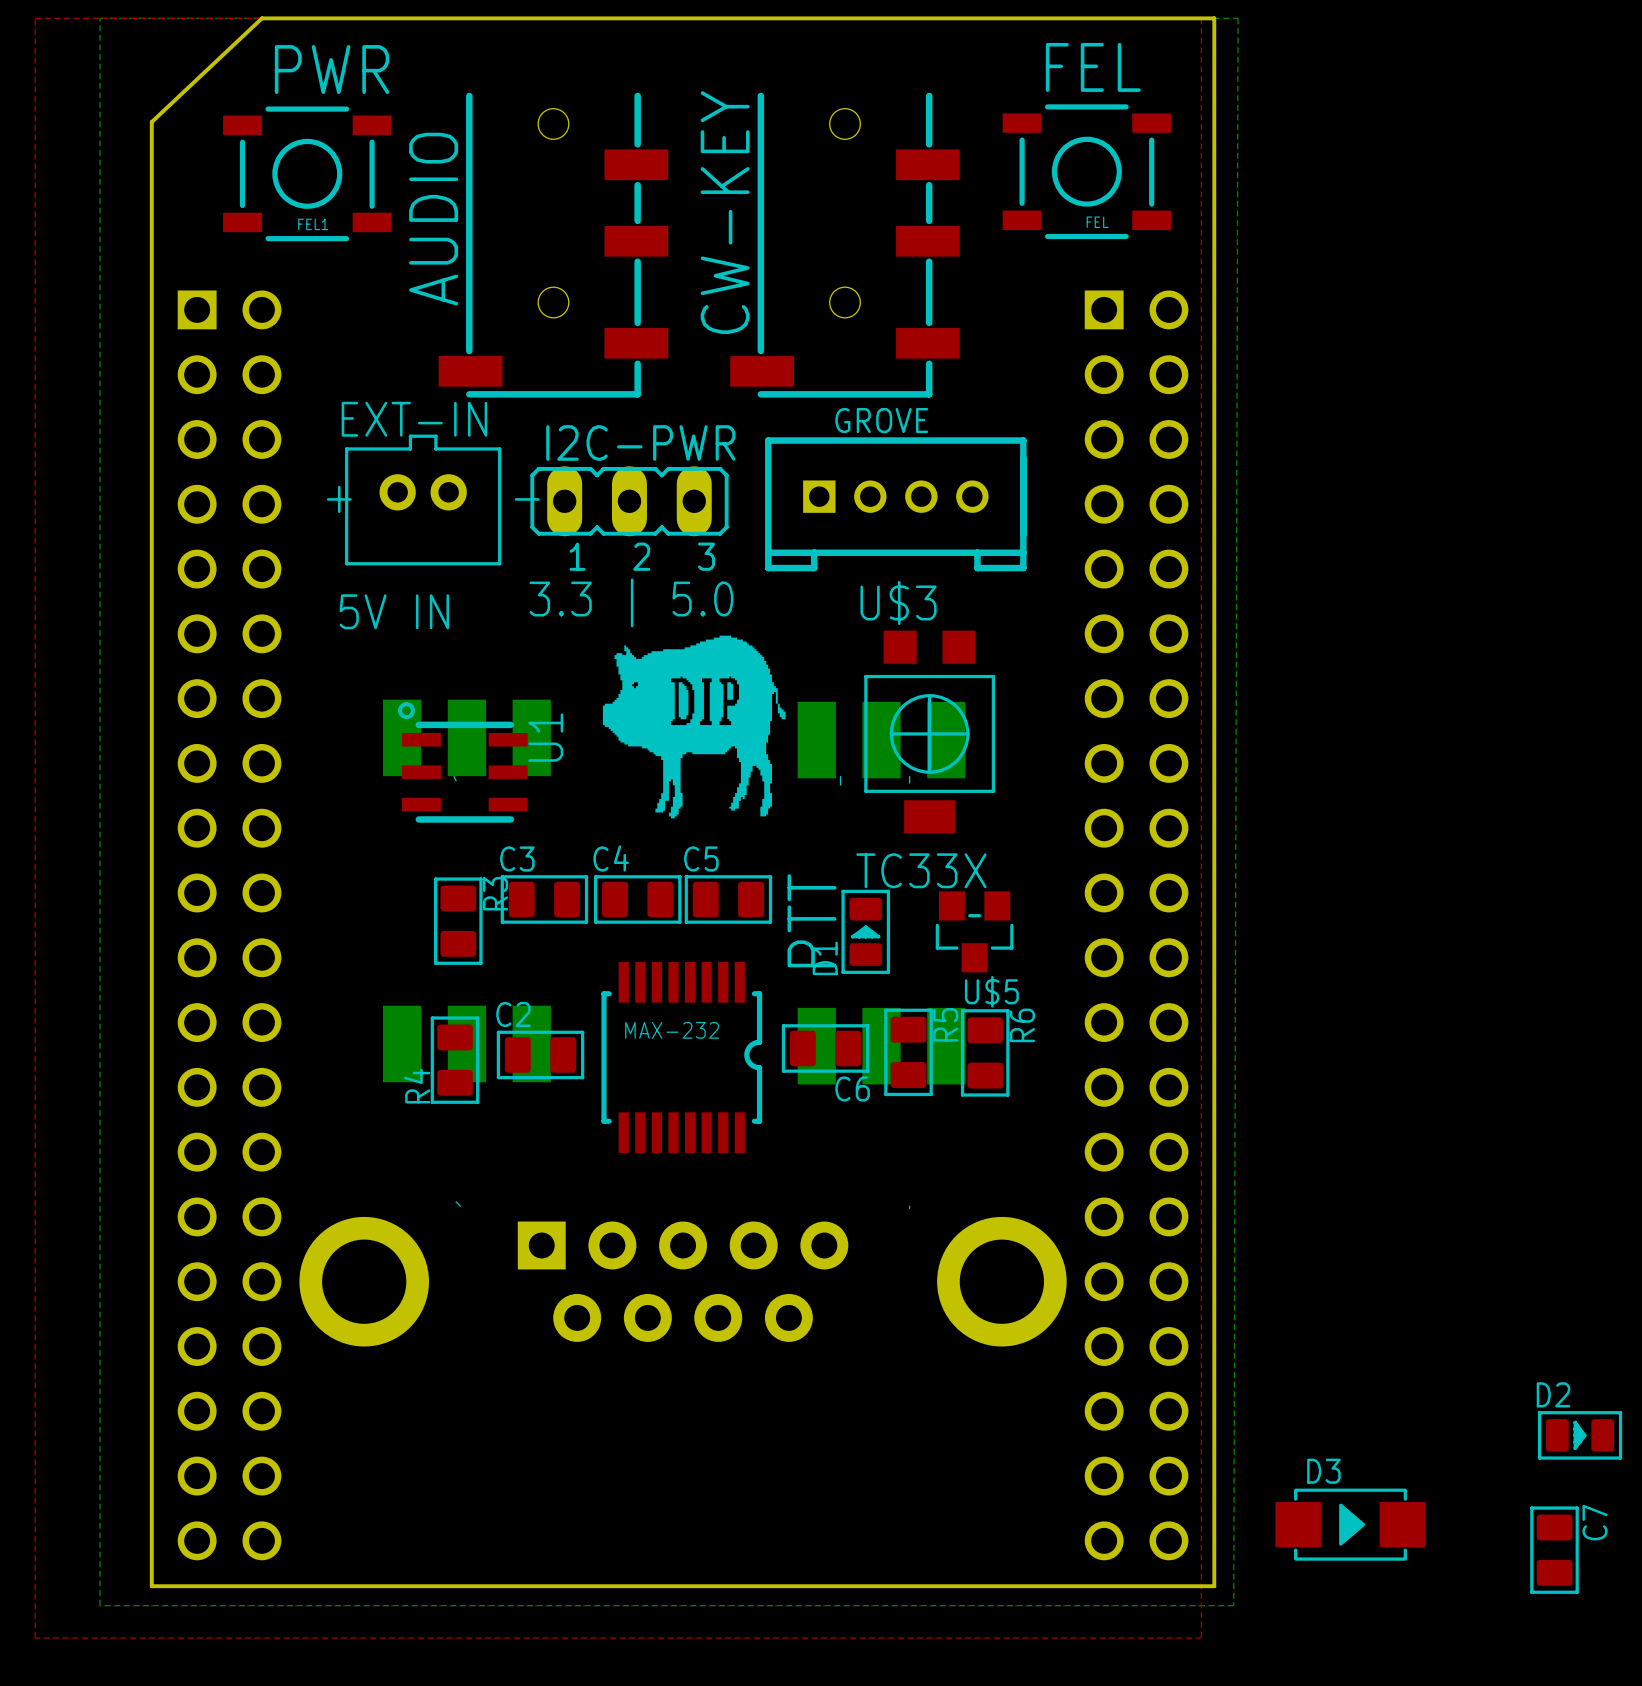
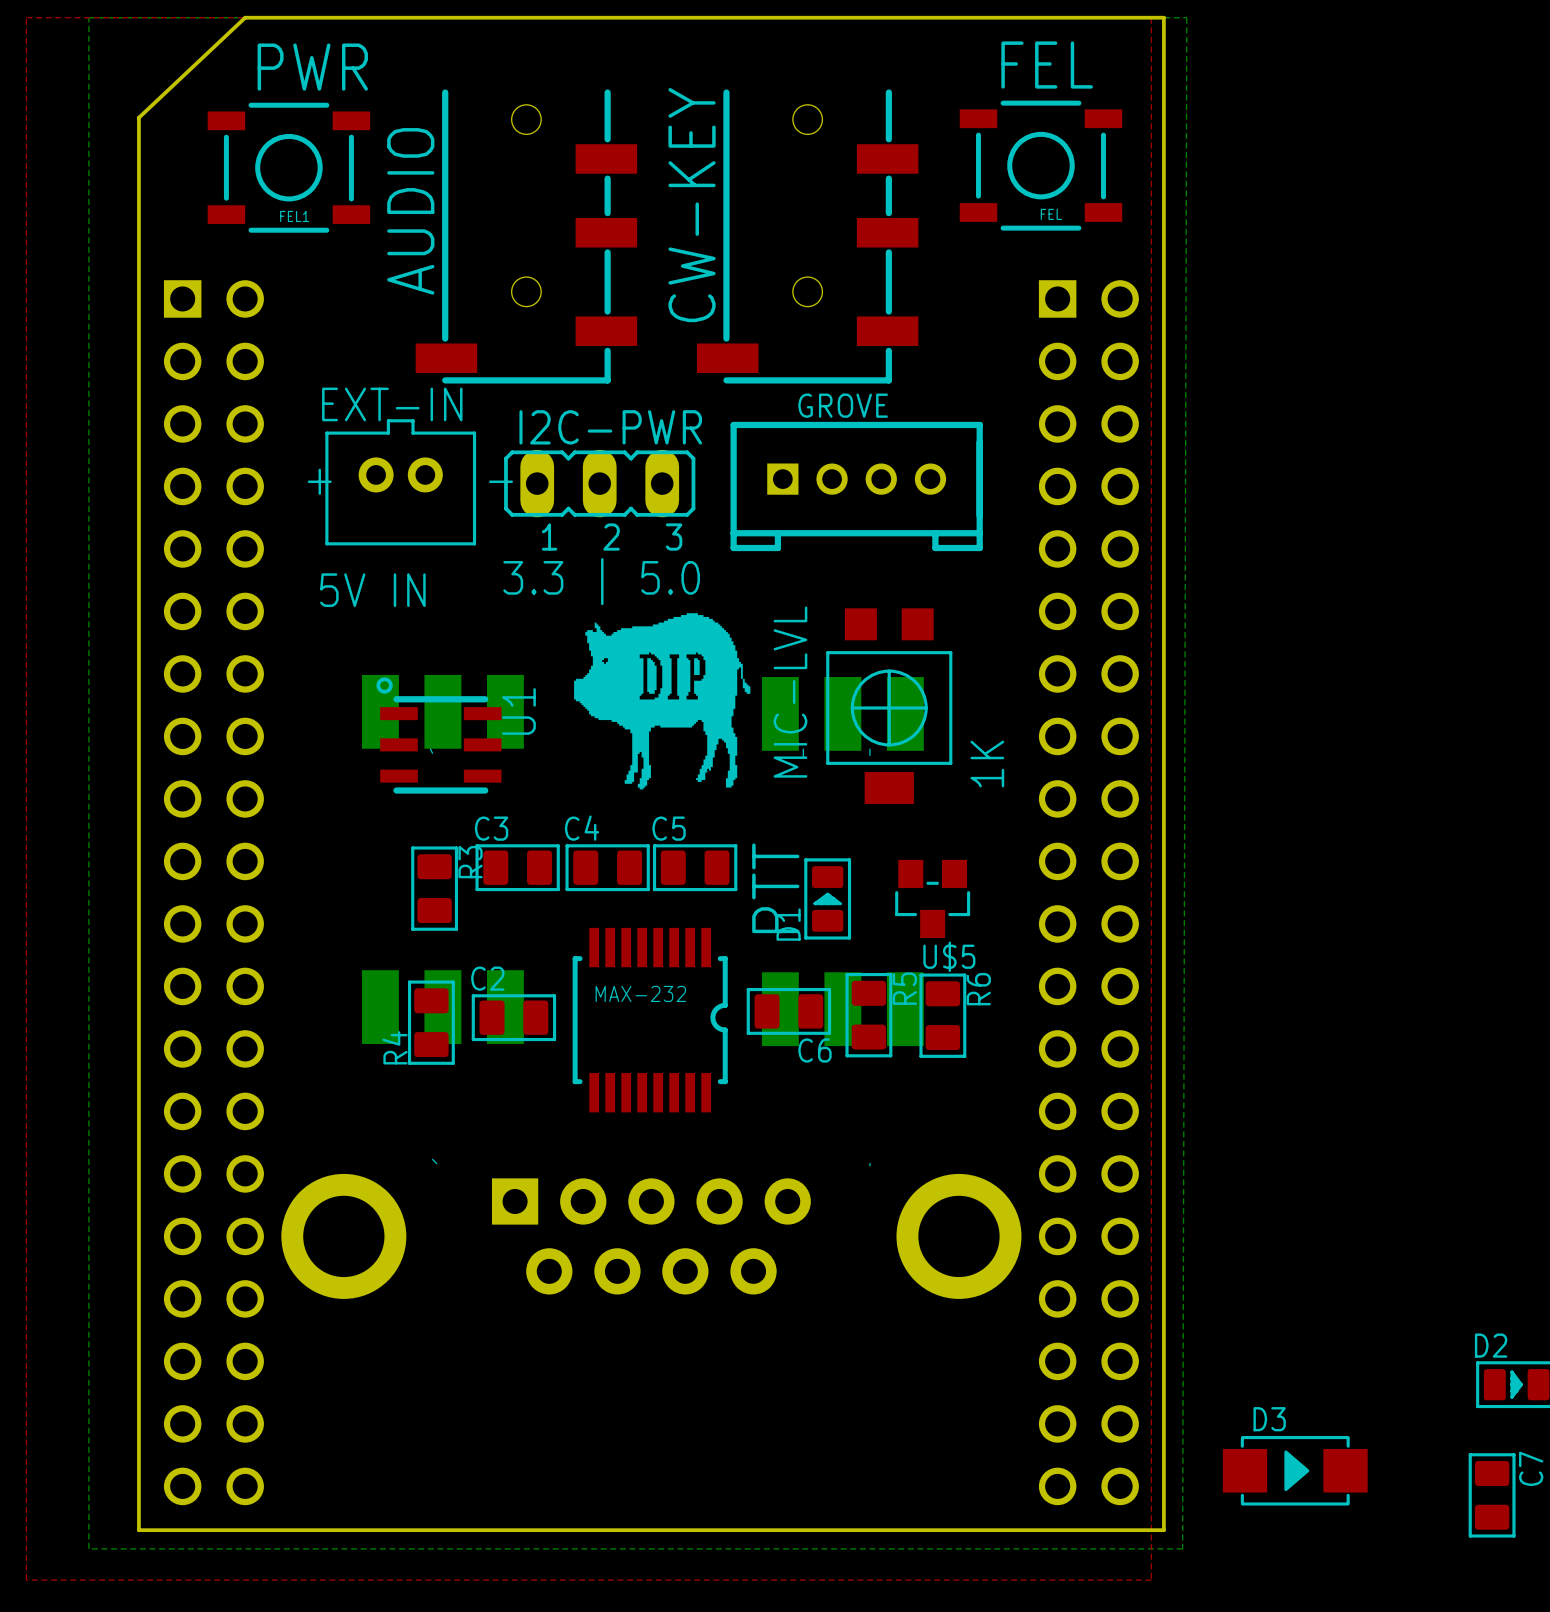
U$3 name: U$3 (898, 602) -> MIC-LVL (790, 692)
U$3 value: TC33X (921, 870) -> 1K (987, 764)

